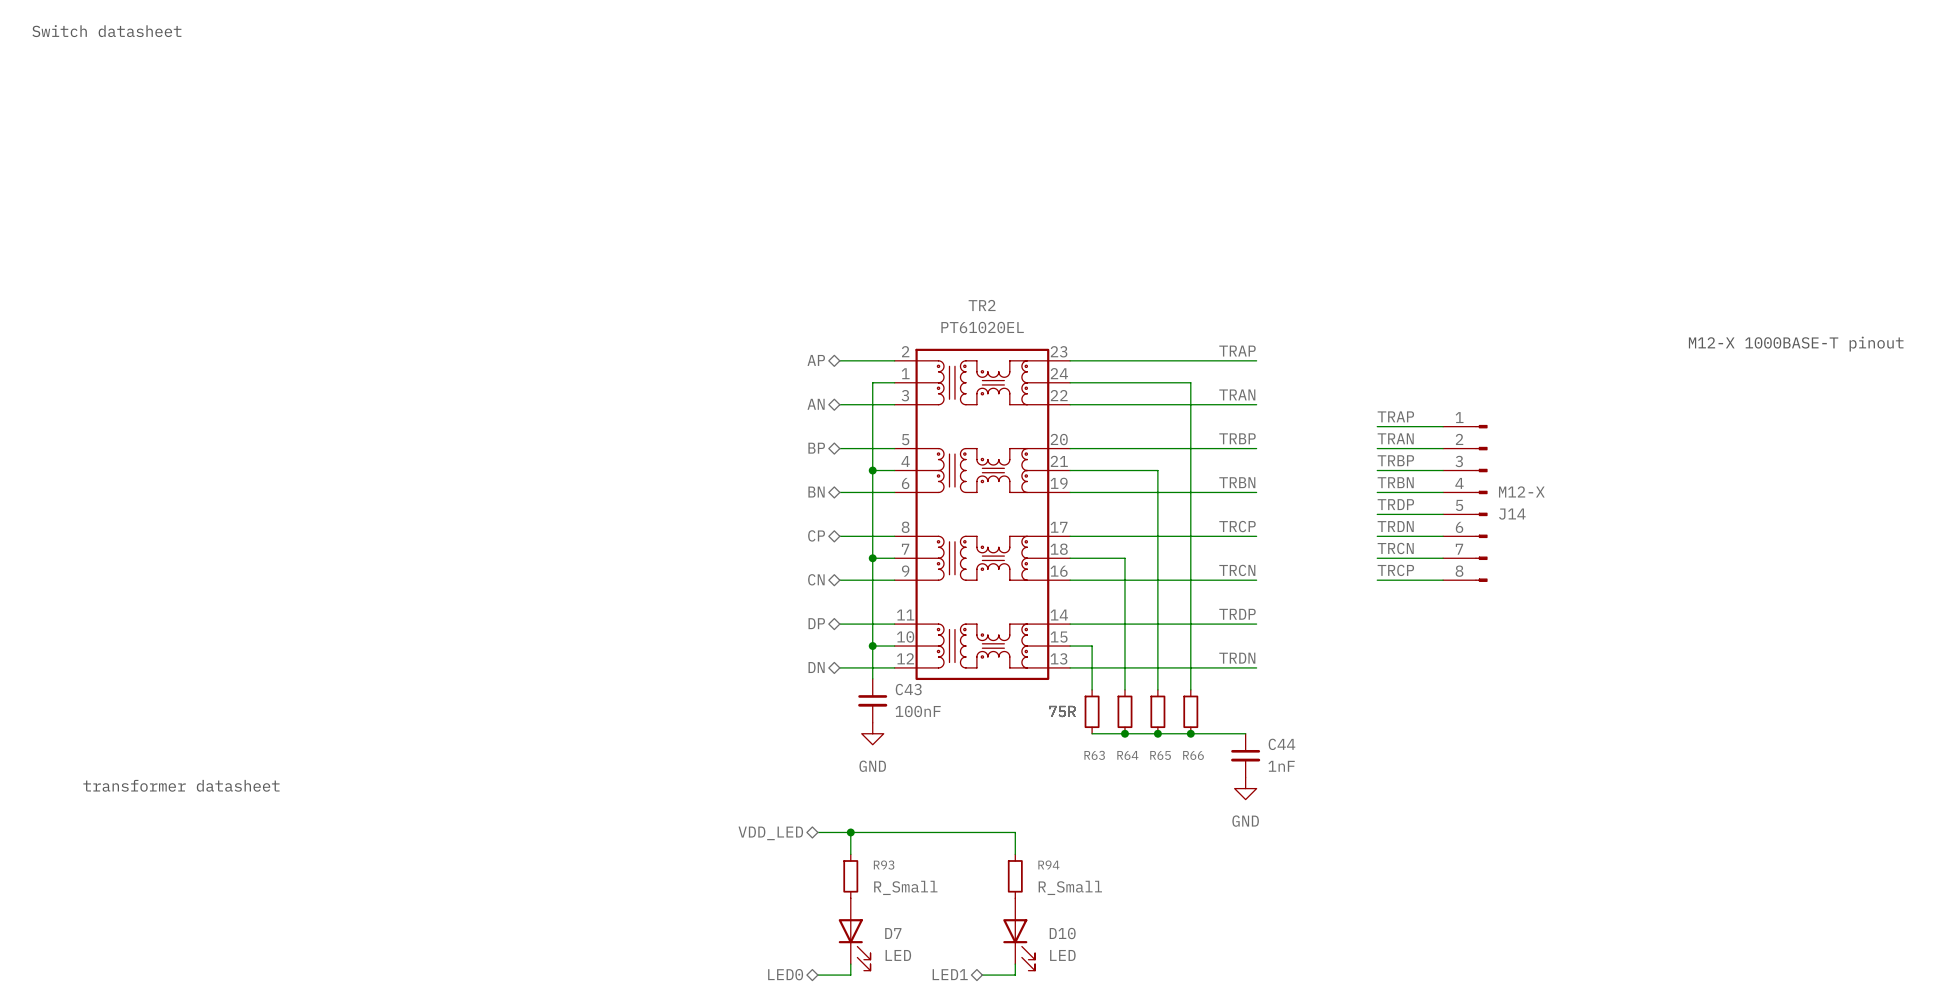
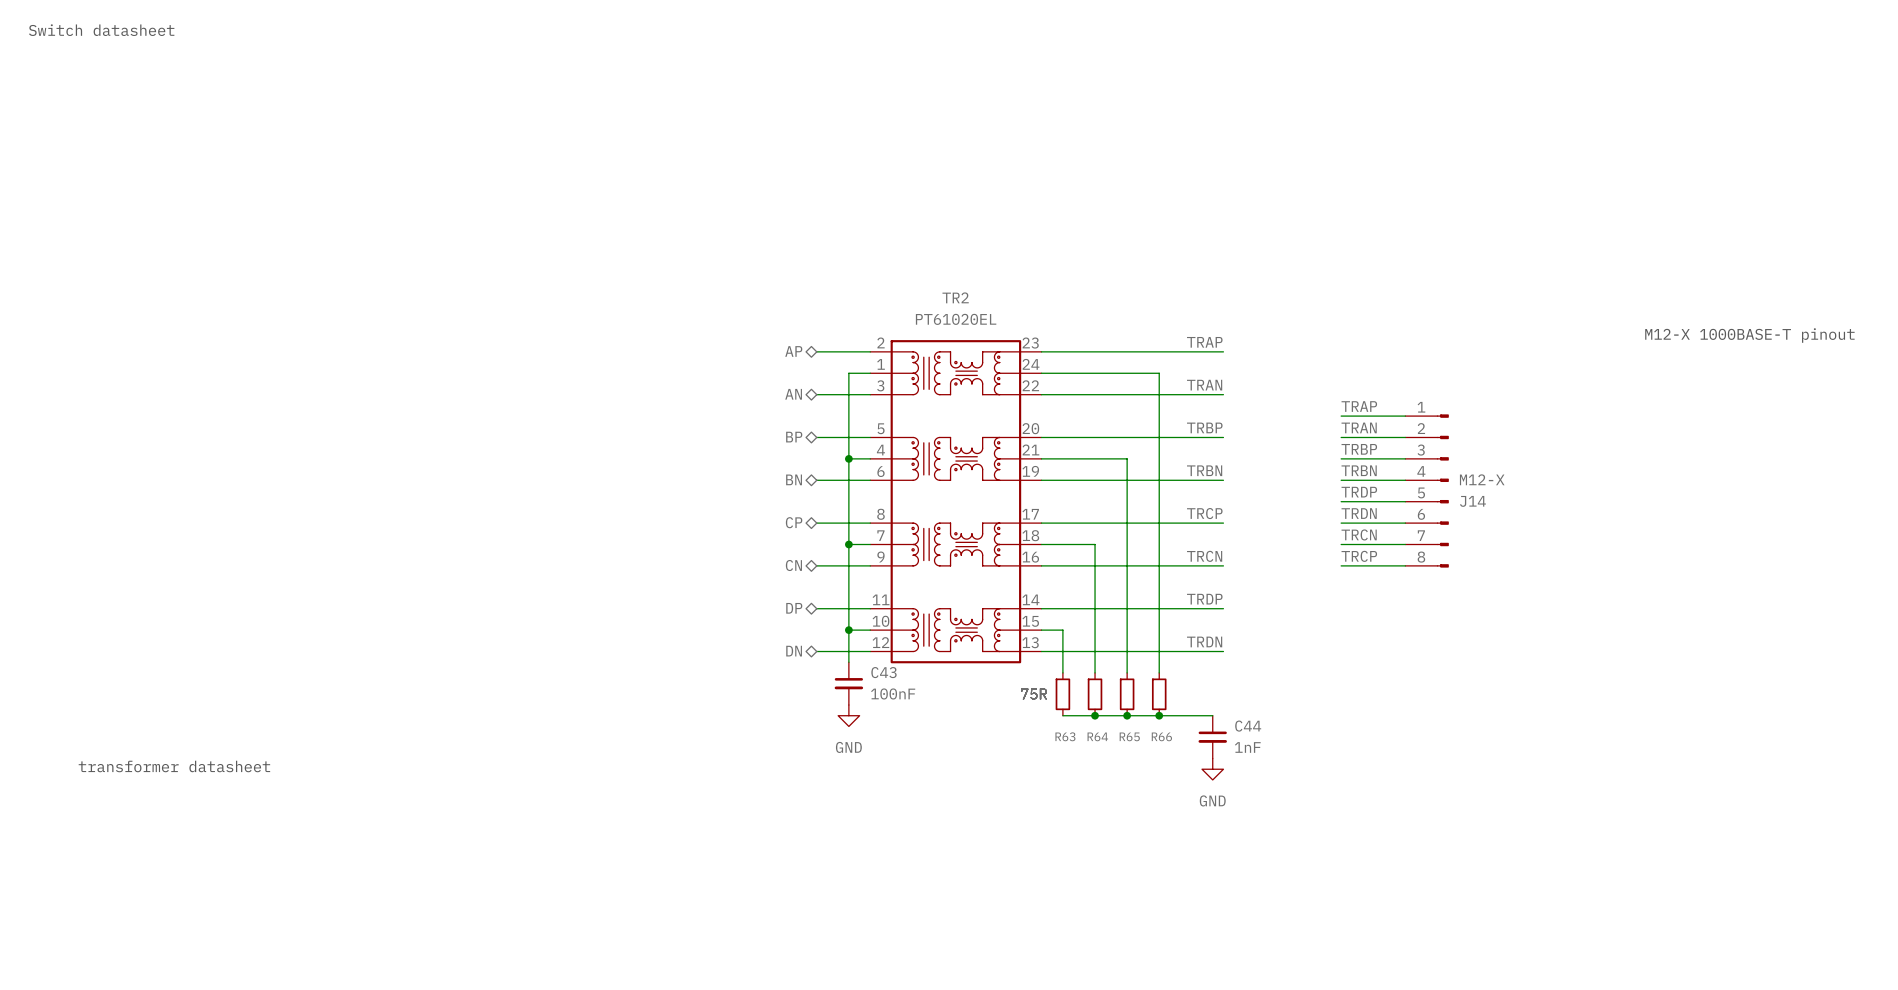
wire: (817, 832) (1015, 832) (1015, 854) -> none
wire: (850, 832) (850, 854) -> none
junction: (850, 832) -> none
hierarchical label: VDD_LED (770, 833) -> none
R93: R_Small (850, 876) -> none
R94: R_Small (1015, 876) -> none
D7: LED (854, 934) -> none
D10: LED (1019, 934) -> none
wire: (850, 964) (850, 975) (817, 975) -> none
wire: (1015, 964) (1015, 975) (982, 975) -> none
hierarchical label: LED0 (785, 974) -> none
hierarchical label: LED1 (950, 974) -> none

